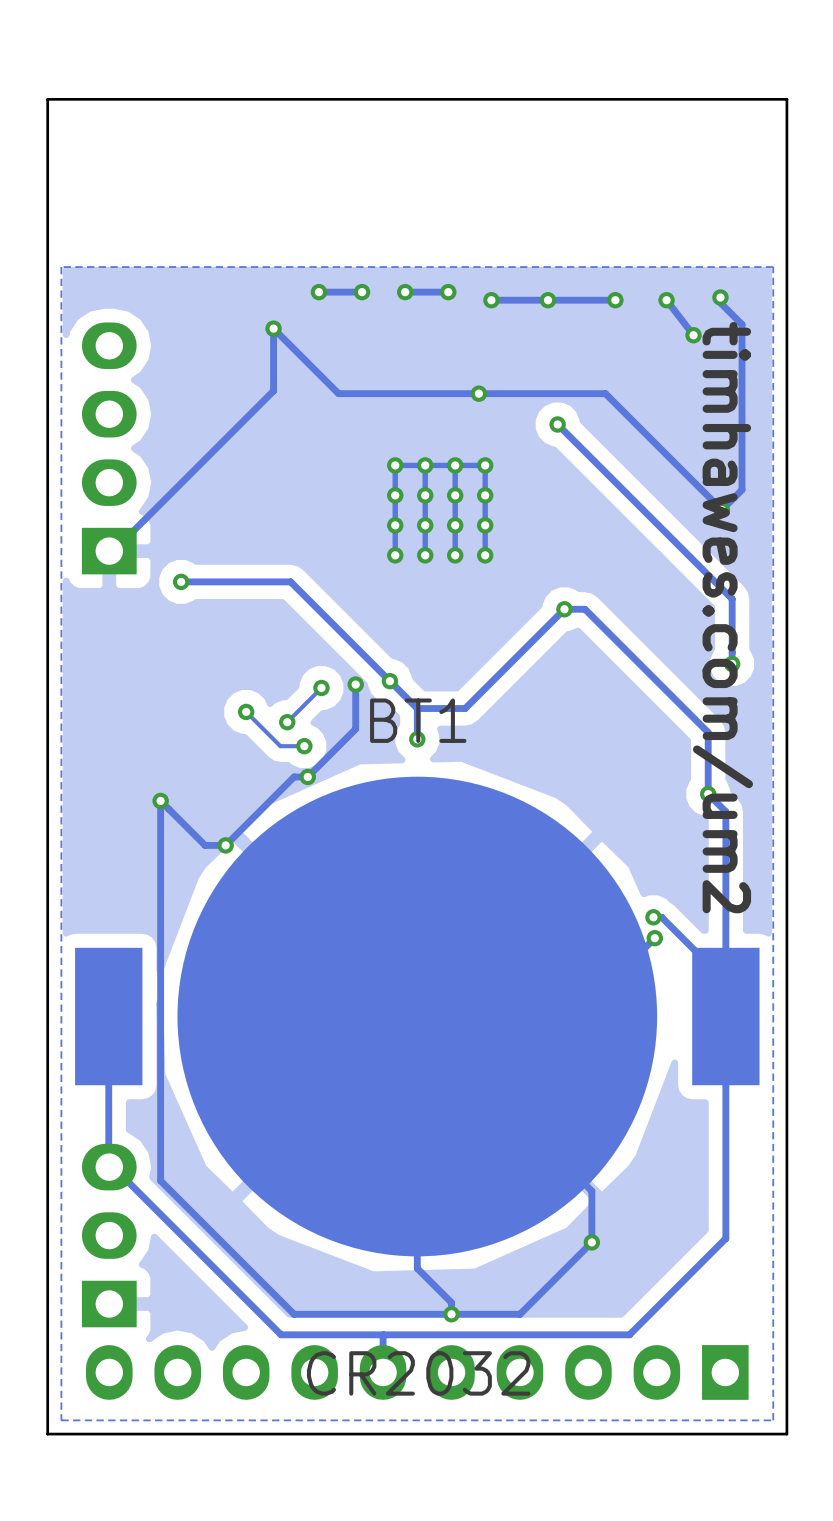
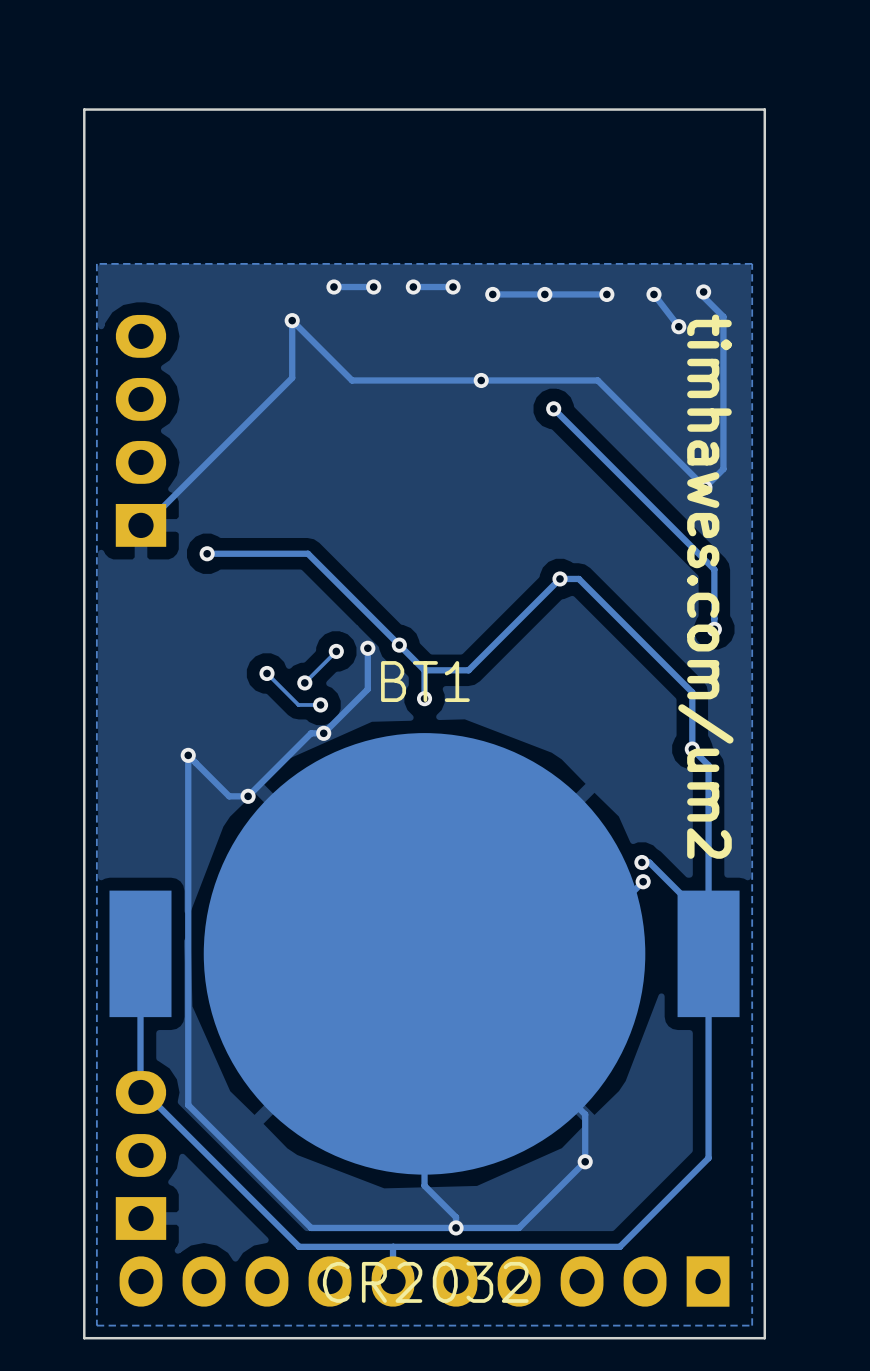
via: (395, 465) -> none
track: (425, 465) (425, 555) -> none
via: (425, 465) -> none
track: (455, 465) (455, 555) -> none
via: (455, 465) -> none
via: (485, 465) -> none
via: (395, 495) -> none
via: (425, 495) -> none
via: (455, 495) -> none
via: (485, 495) -> none
via: (395, 525) -> none
via: (425, 525) -> none
via: (455, 525) -> none
via: (485, 525) -> none
via: (395, 555) -> none
via: (425, 555) -> none
via: (455, 555) -> none
track: (485, 555) (485, 465) (395, 465) (395, 555) -> none
via: (485, 555) -> none

